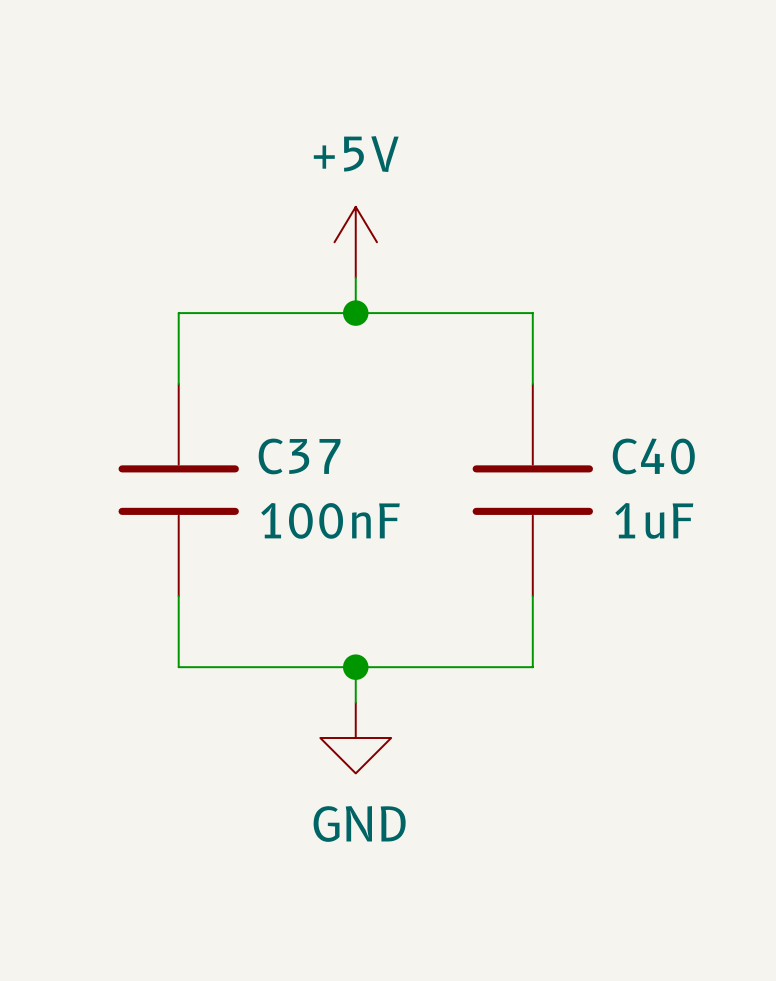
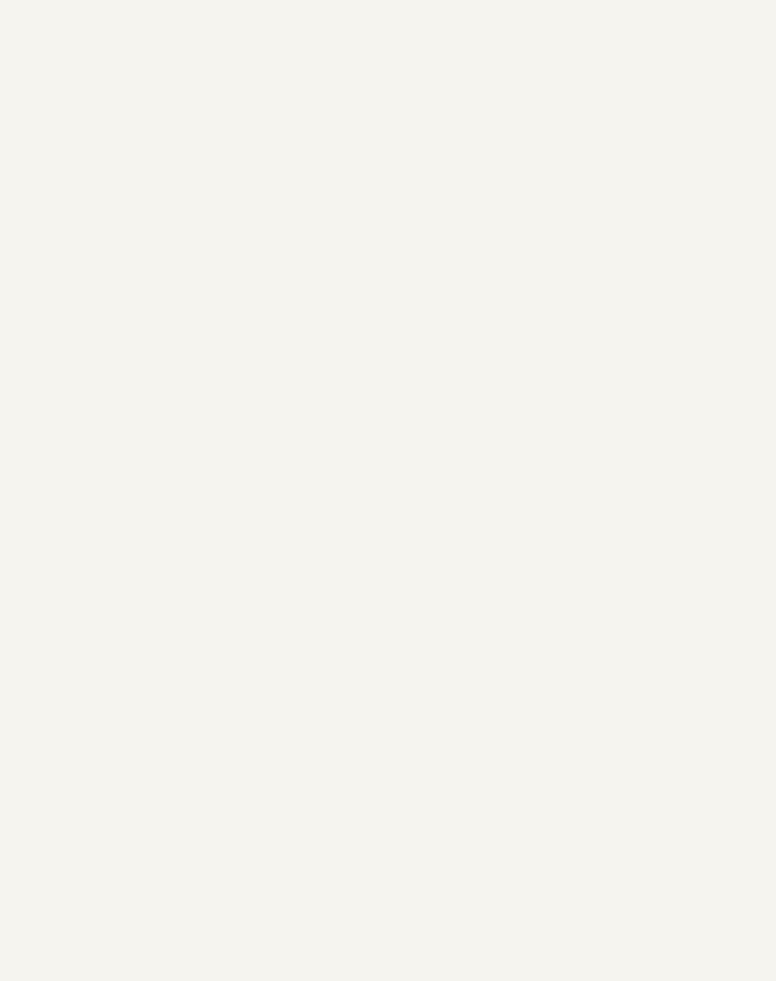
power symbol: +5V (355, 242) -> none
wire: (355, 277) (355, 313) -> none
junction: (355, 313) -> none
wire: (178, 383) (178, 313) (532, 313) (532, 383) -> none
C37: 100nF (178, 490) -> none
C40: 1uF (532, 490) -> none
wire: (178, 596) (178, 667) (532, 667) (532, 596) -> none
wire: (355, 667) (355, 702) -> none
junction: (355, 667) -> none
power symbol: GND (355, 738) -> none

